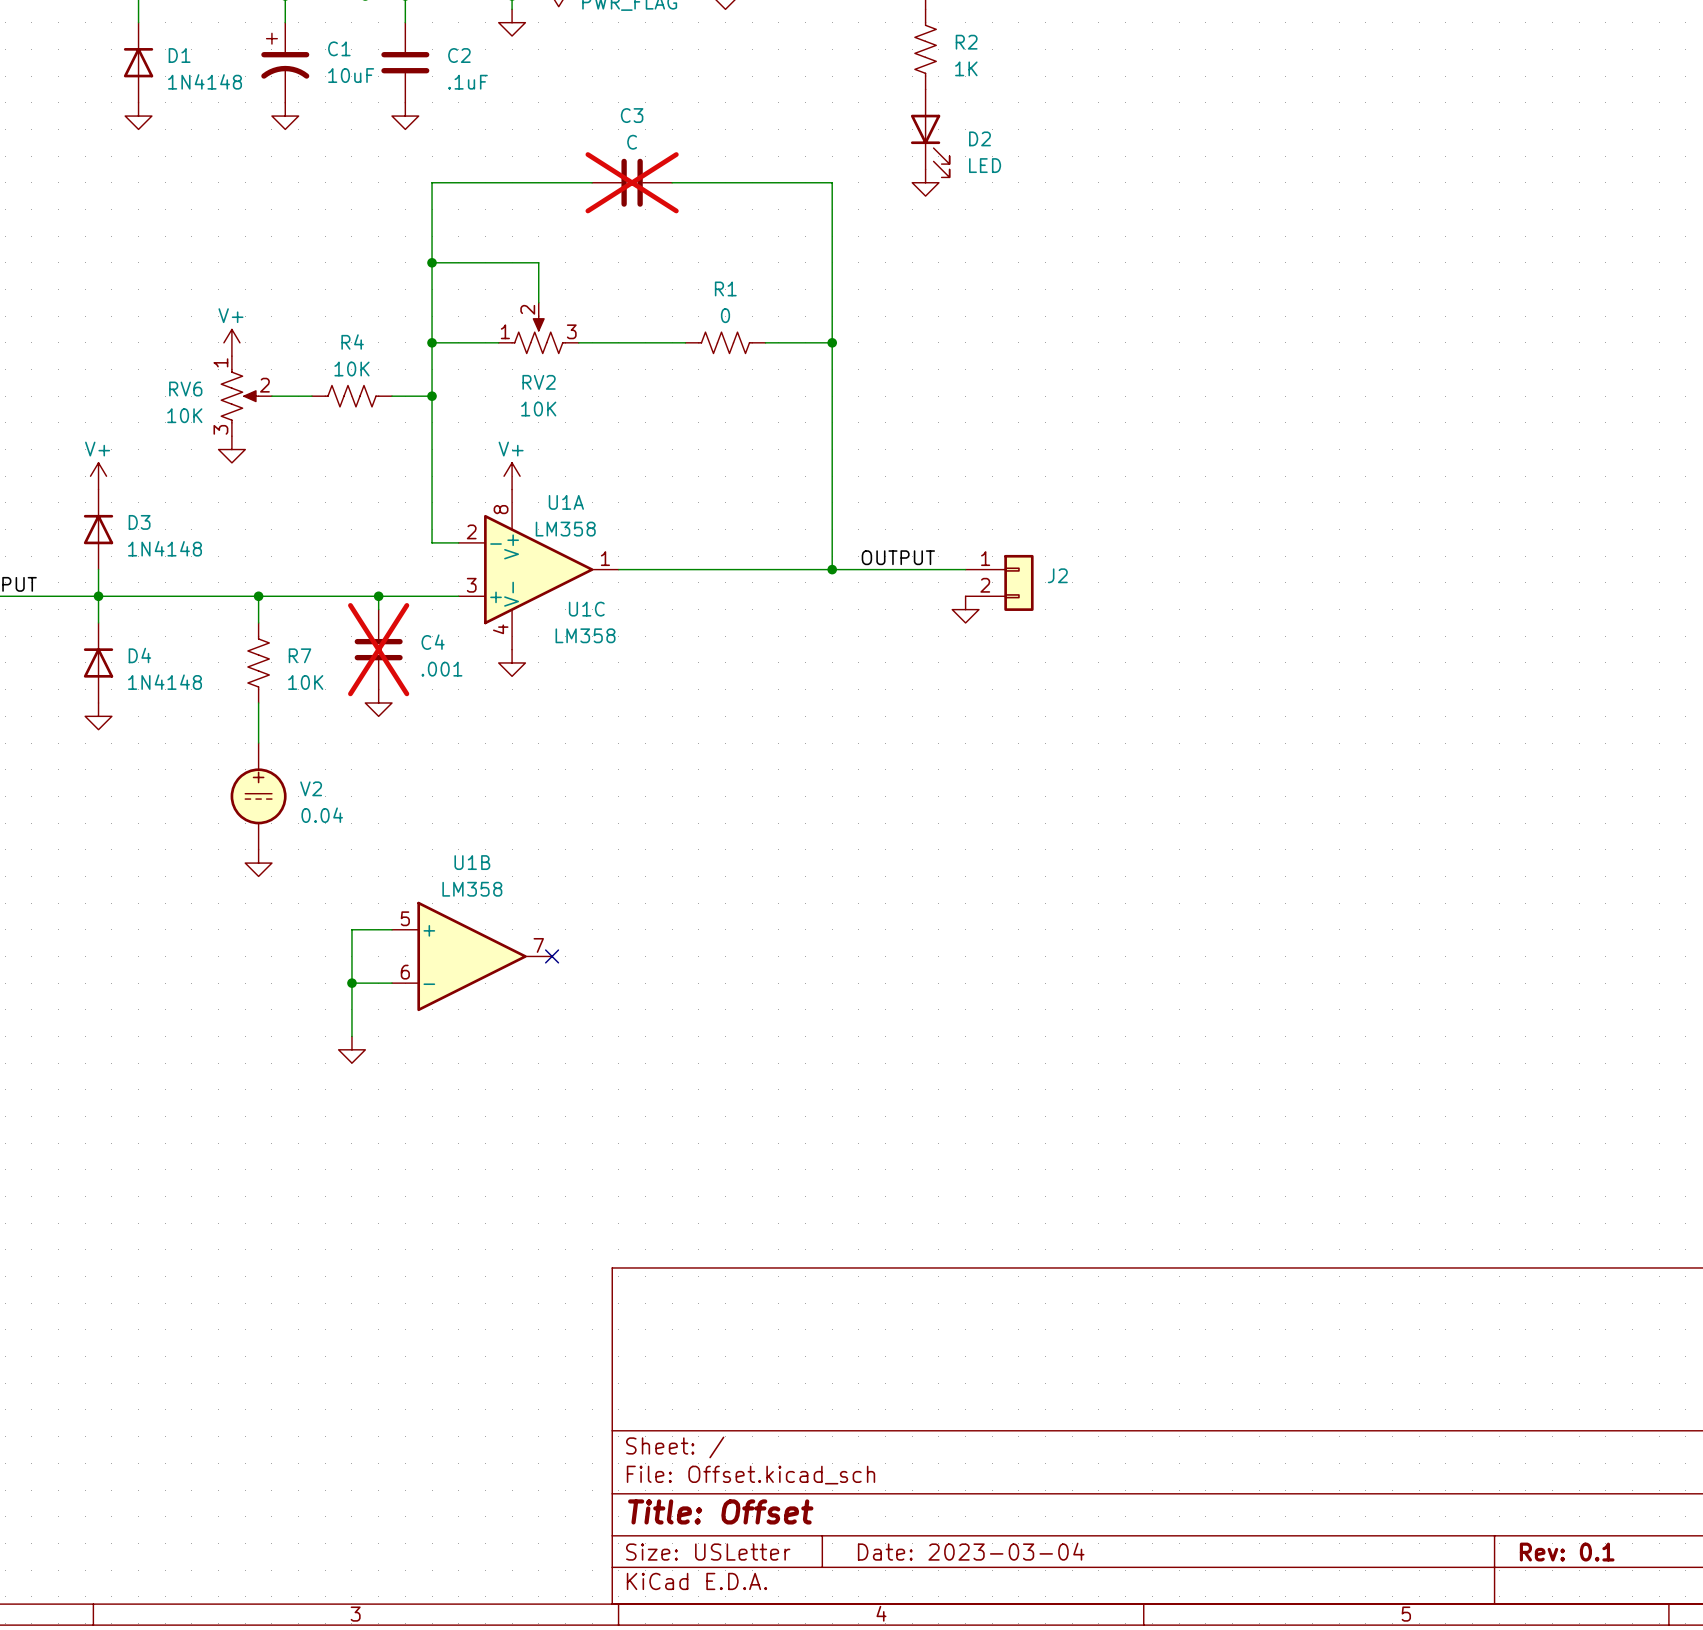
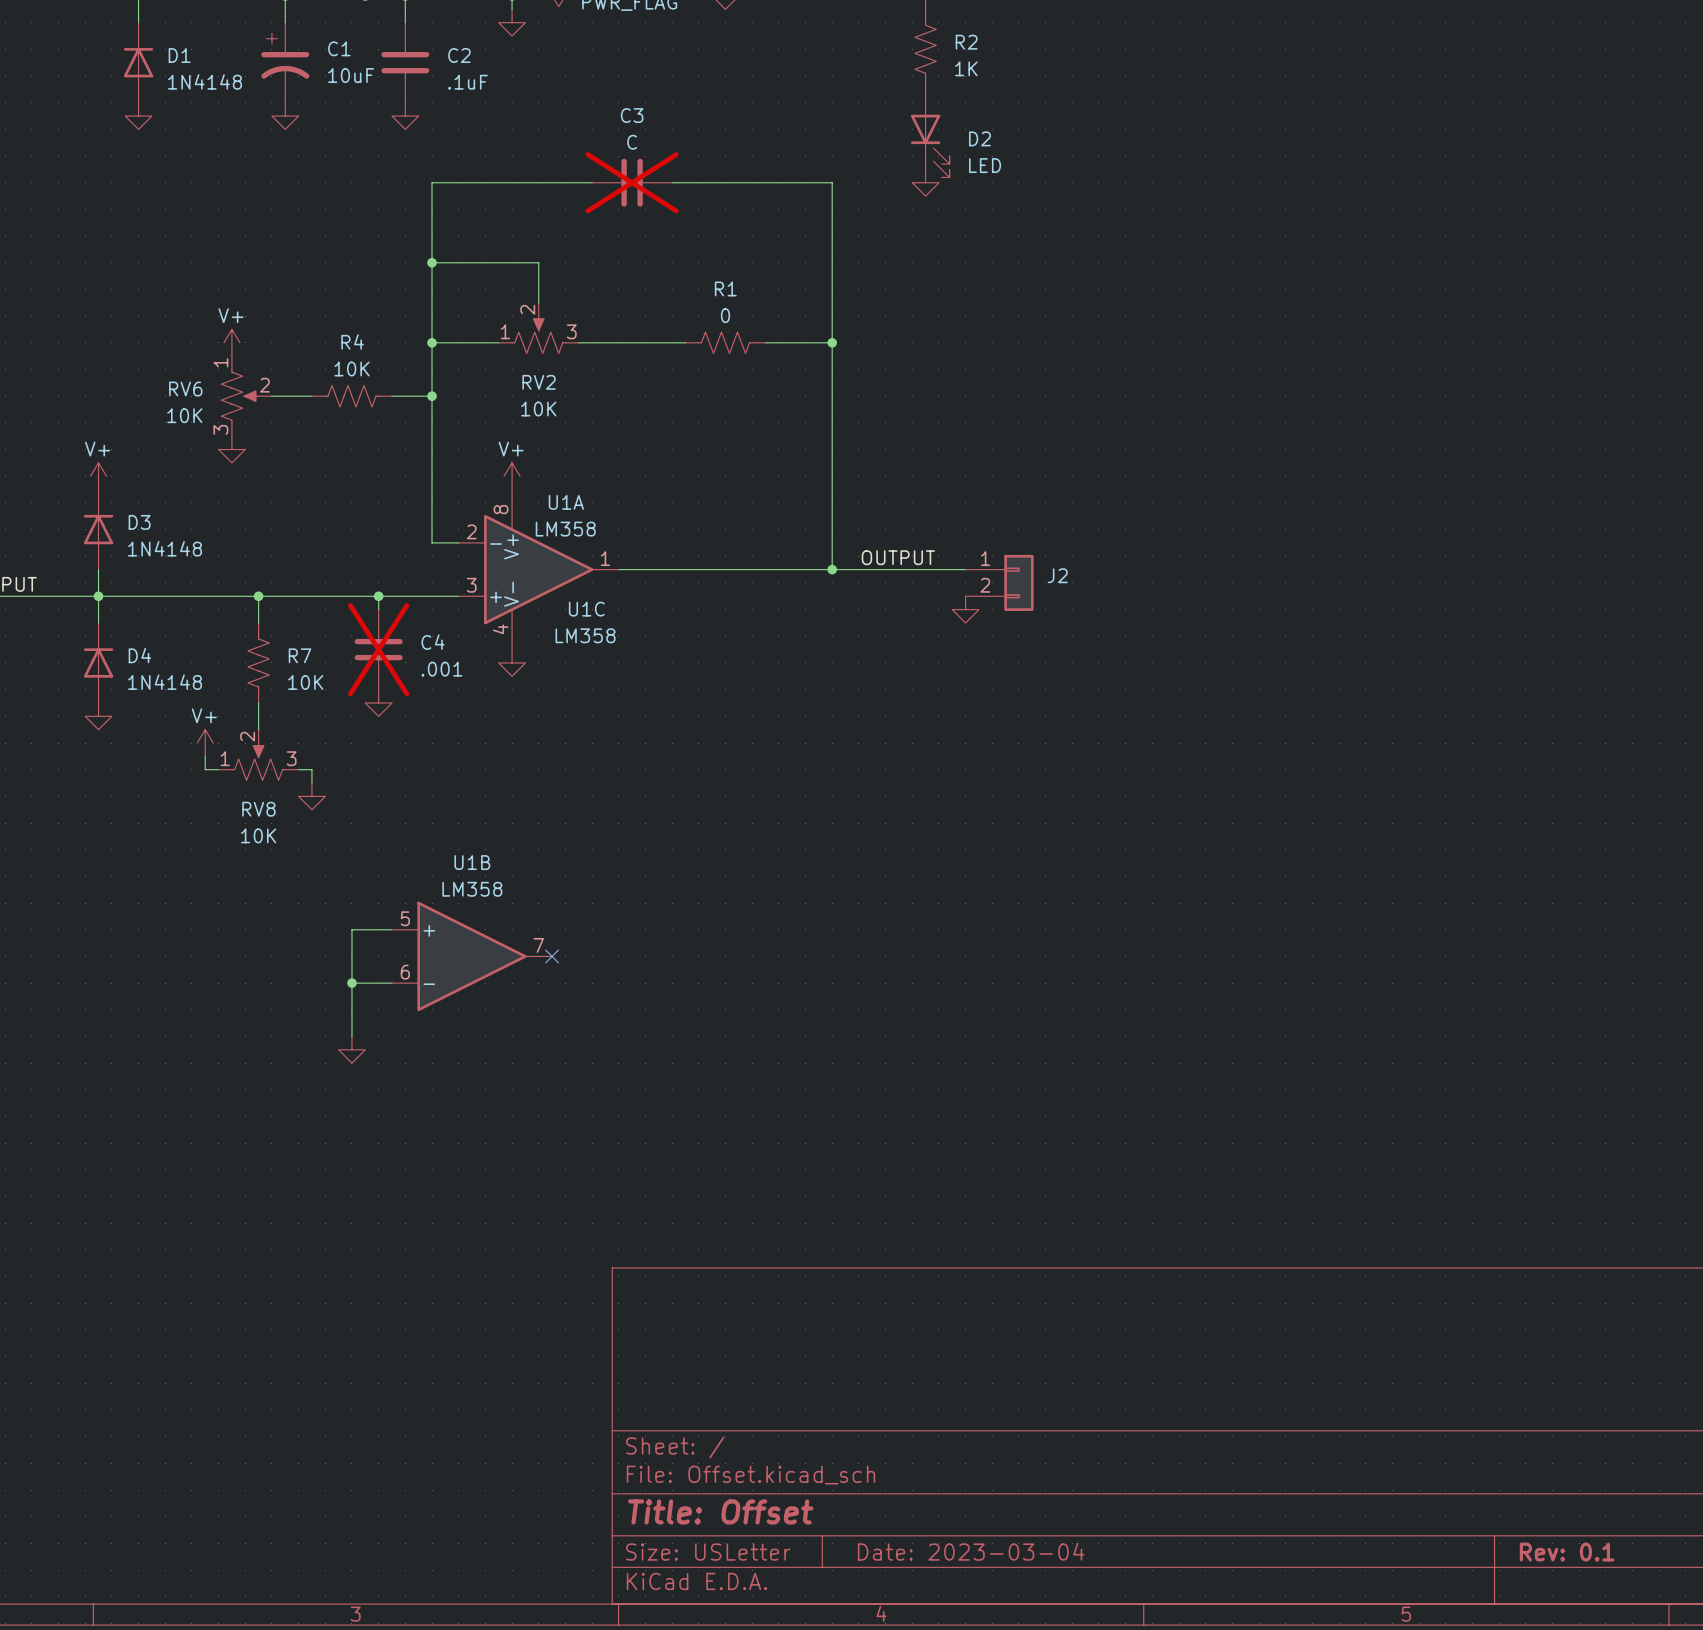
power symbol: none -> V+ (205, 743)
RV8: none -> 10K (258, 755)
wire: none -> (205, 756) (205, 769) (218, 769)
wire: none -> (298, 769) (311, 769) (311, 783)
V2: 0.04 (258, 796) -> none
power symbol position: (258, 863) -> (311, 796)

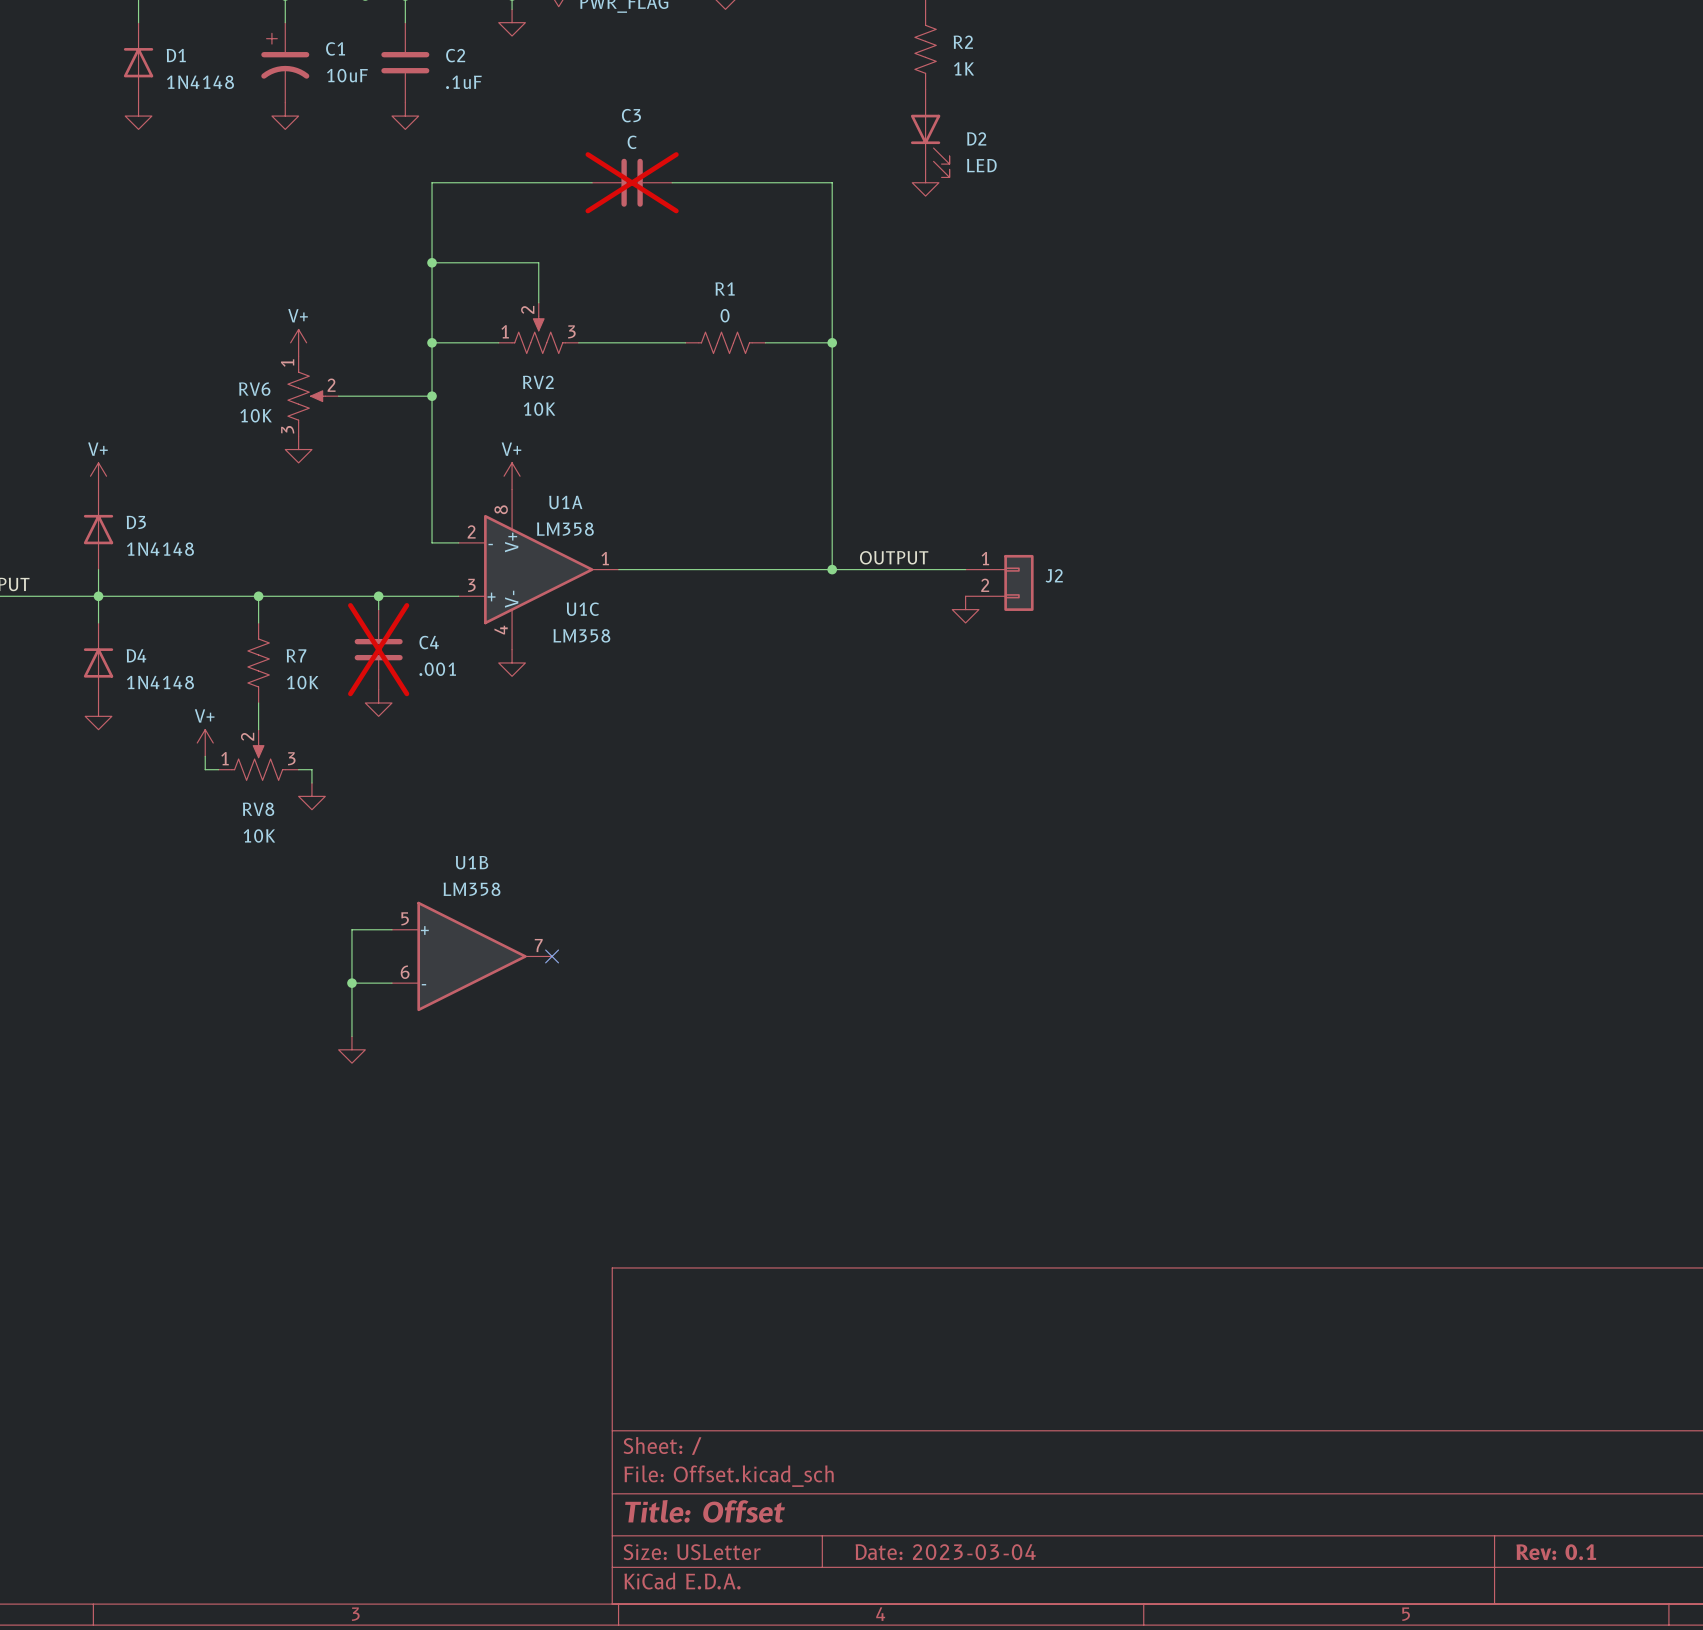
power symbol position: V+ (231, 342) -> V+ (298, 342)
RV6 position: (246, 396) -> (313, 396)
wire: (271, 396) (311, 396) -> none
wire: none -> (338, 396) (392, 396)
R4: 10K (351, 396) -> none
power symbol position: (231, 449) -> (298, 449)

